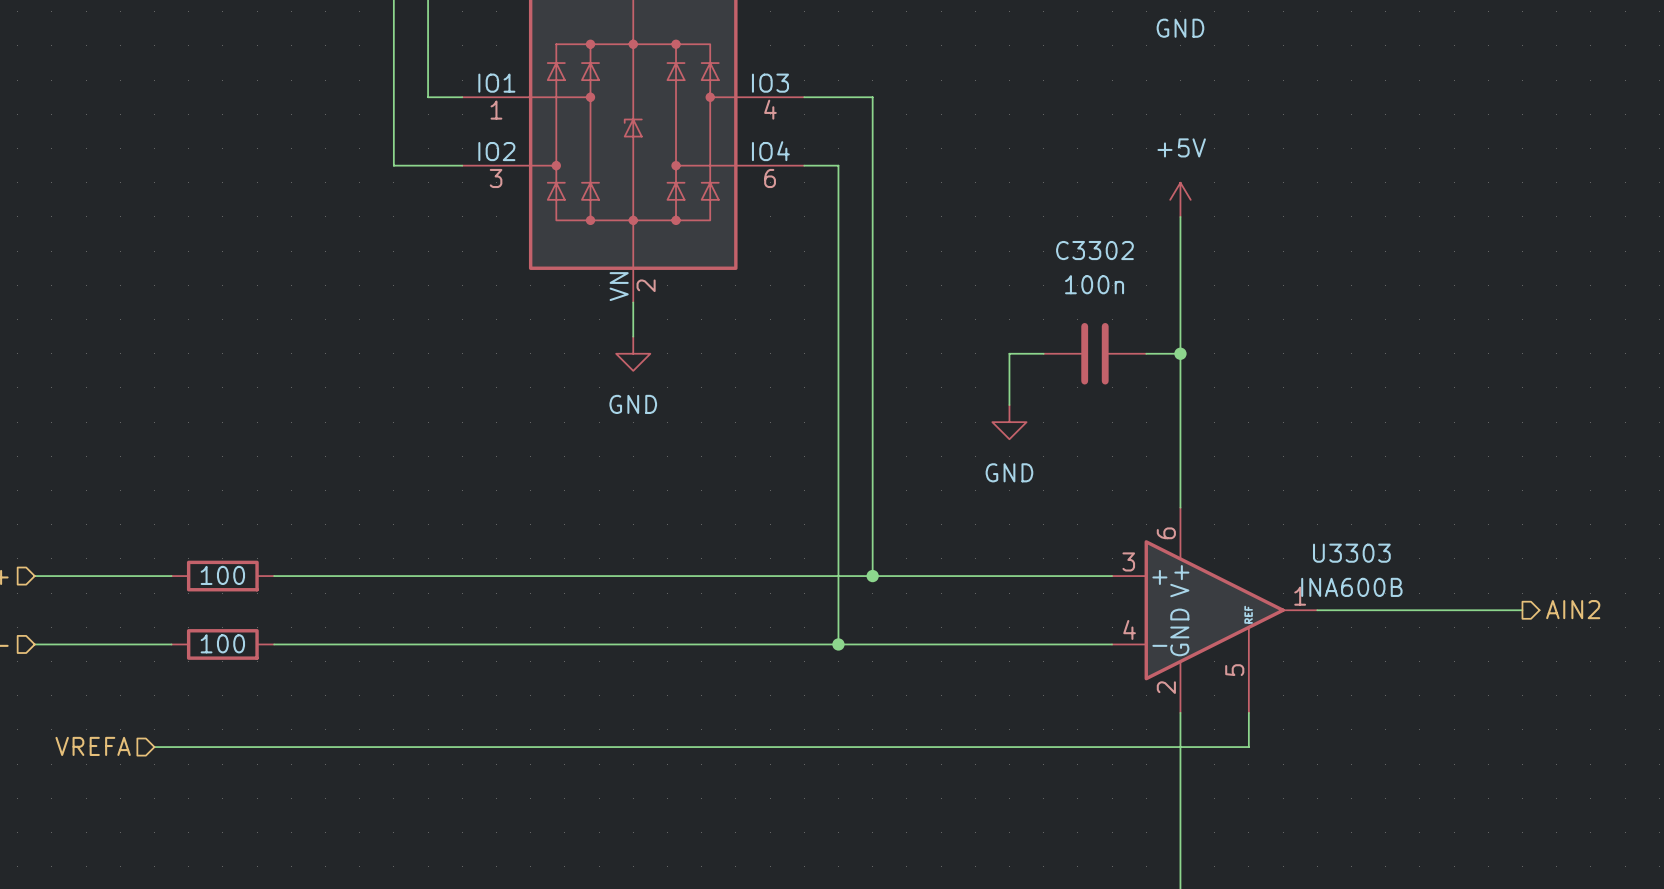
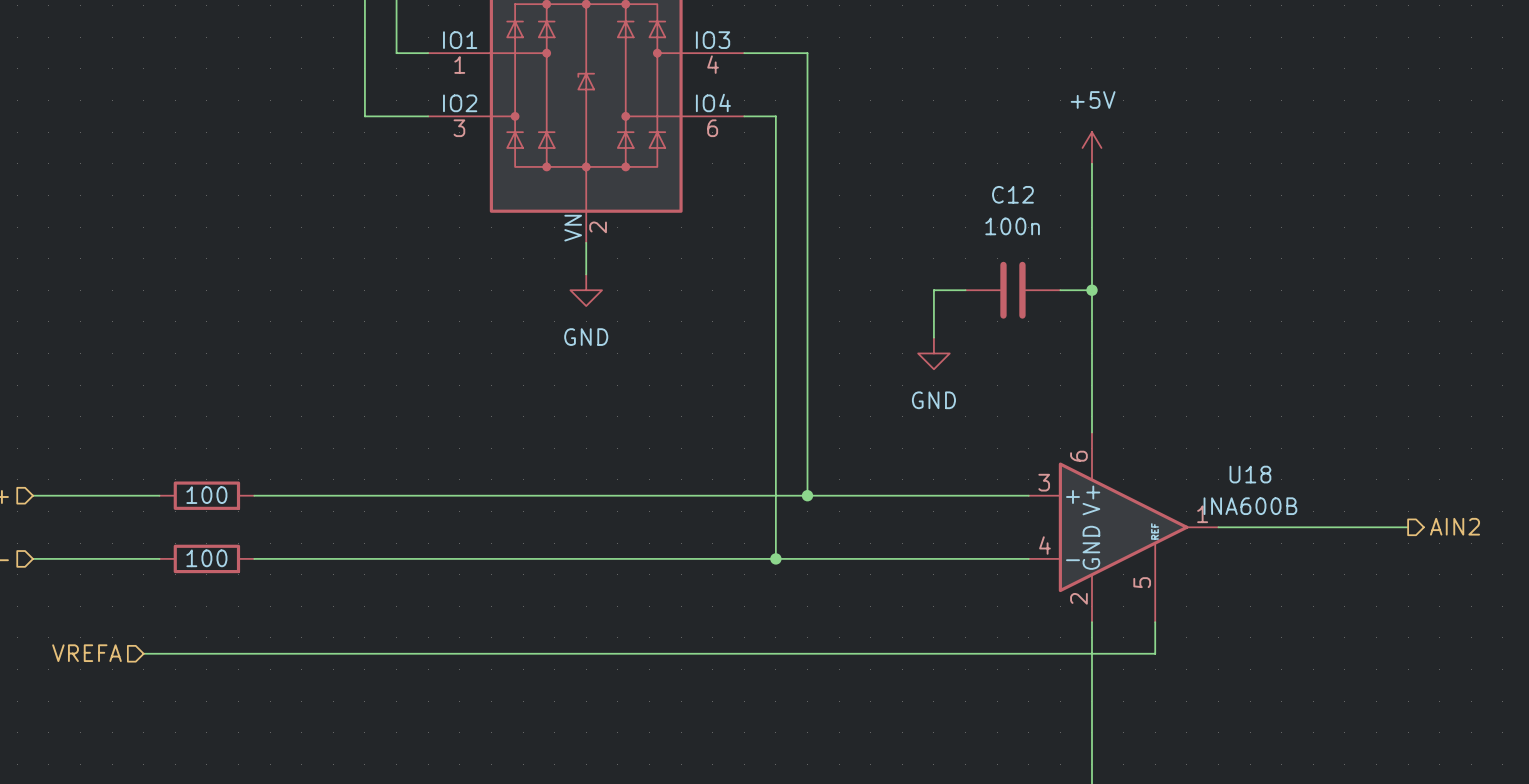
C3302 name: C3302 (1094, 250) -> C12 (1012, 194)
U3303 name: U3303 (1351, 553) -> U18 (1250, 474)

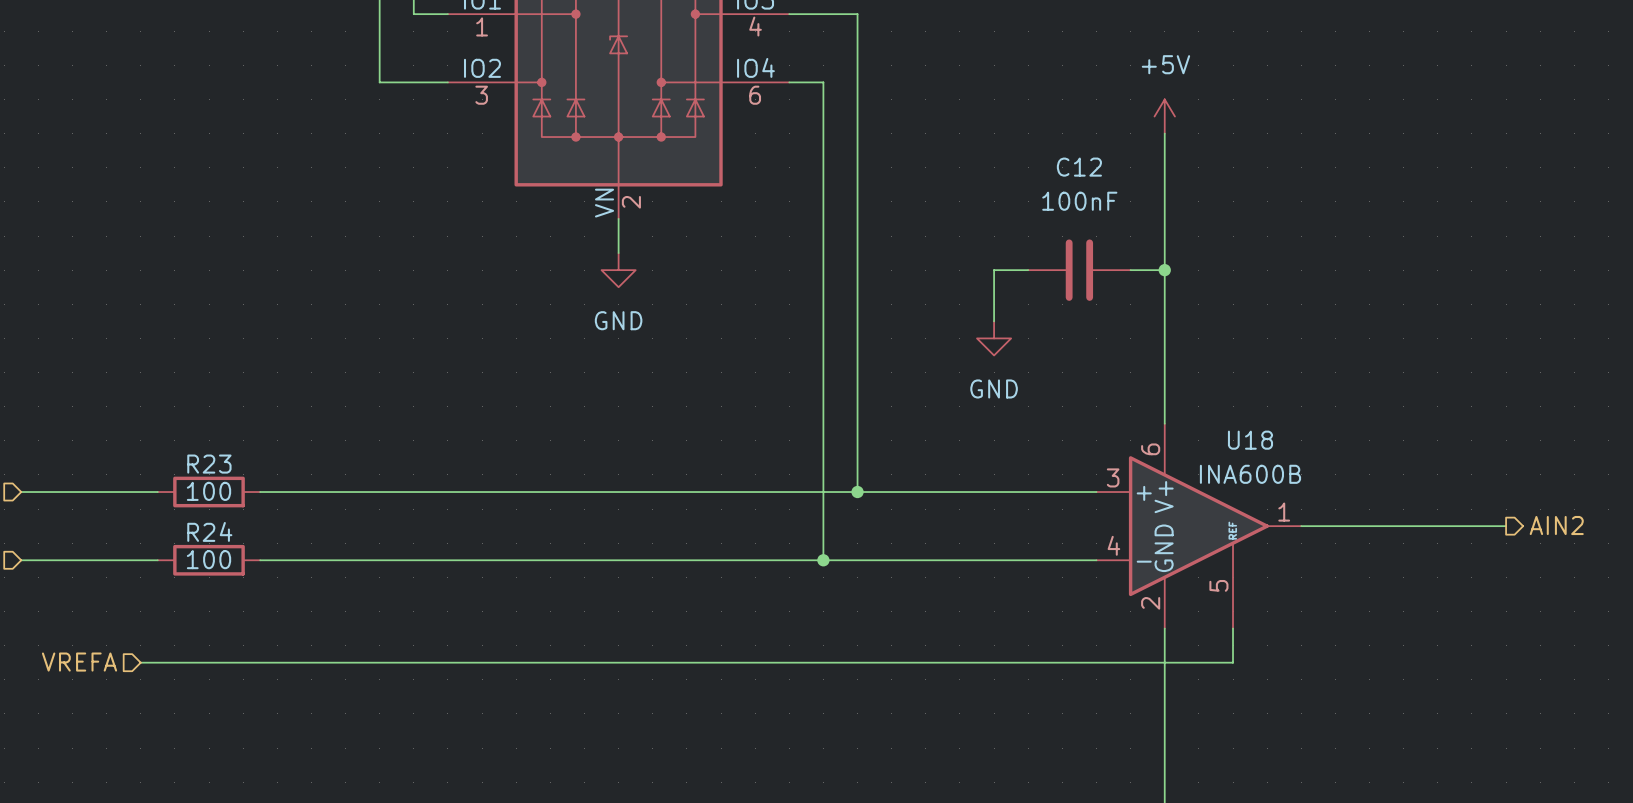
C12 value: 100n (1012, 226) -> 100nF (1079, 201)
R23 name: none -> R23 (209, 464)
U18 name position: U18 (1250, 474) -> U18 (1250, 440)
U18 value position: INA600B (1250, 506) -> INA600B (1250, 474)
R24 name: none -> R24 (209, 531)

